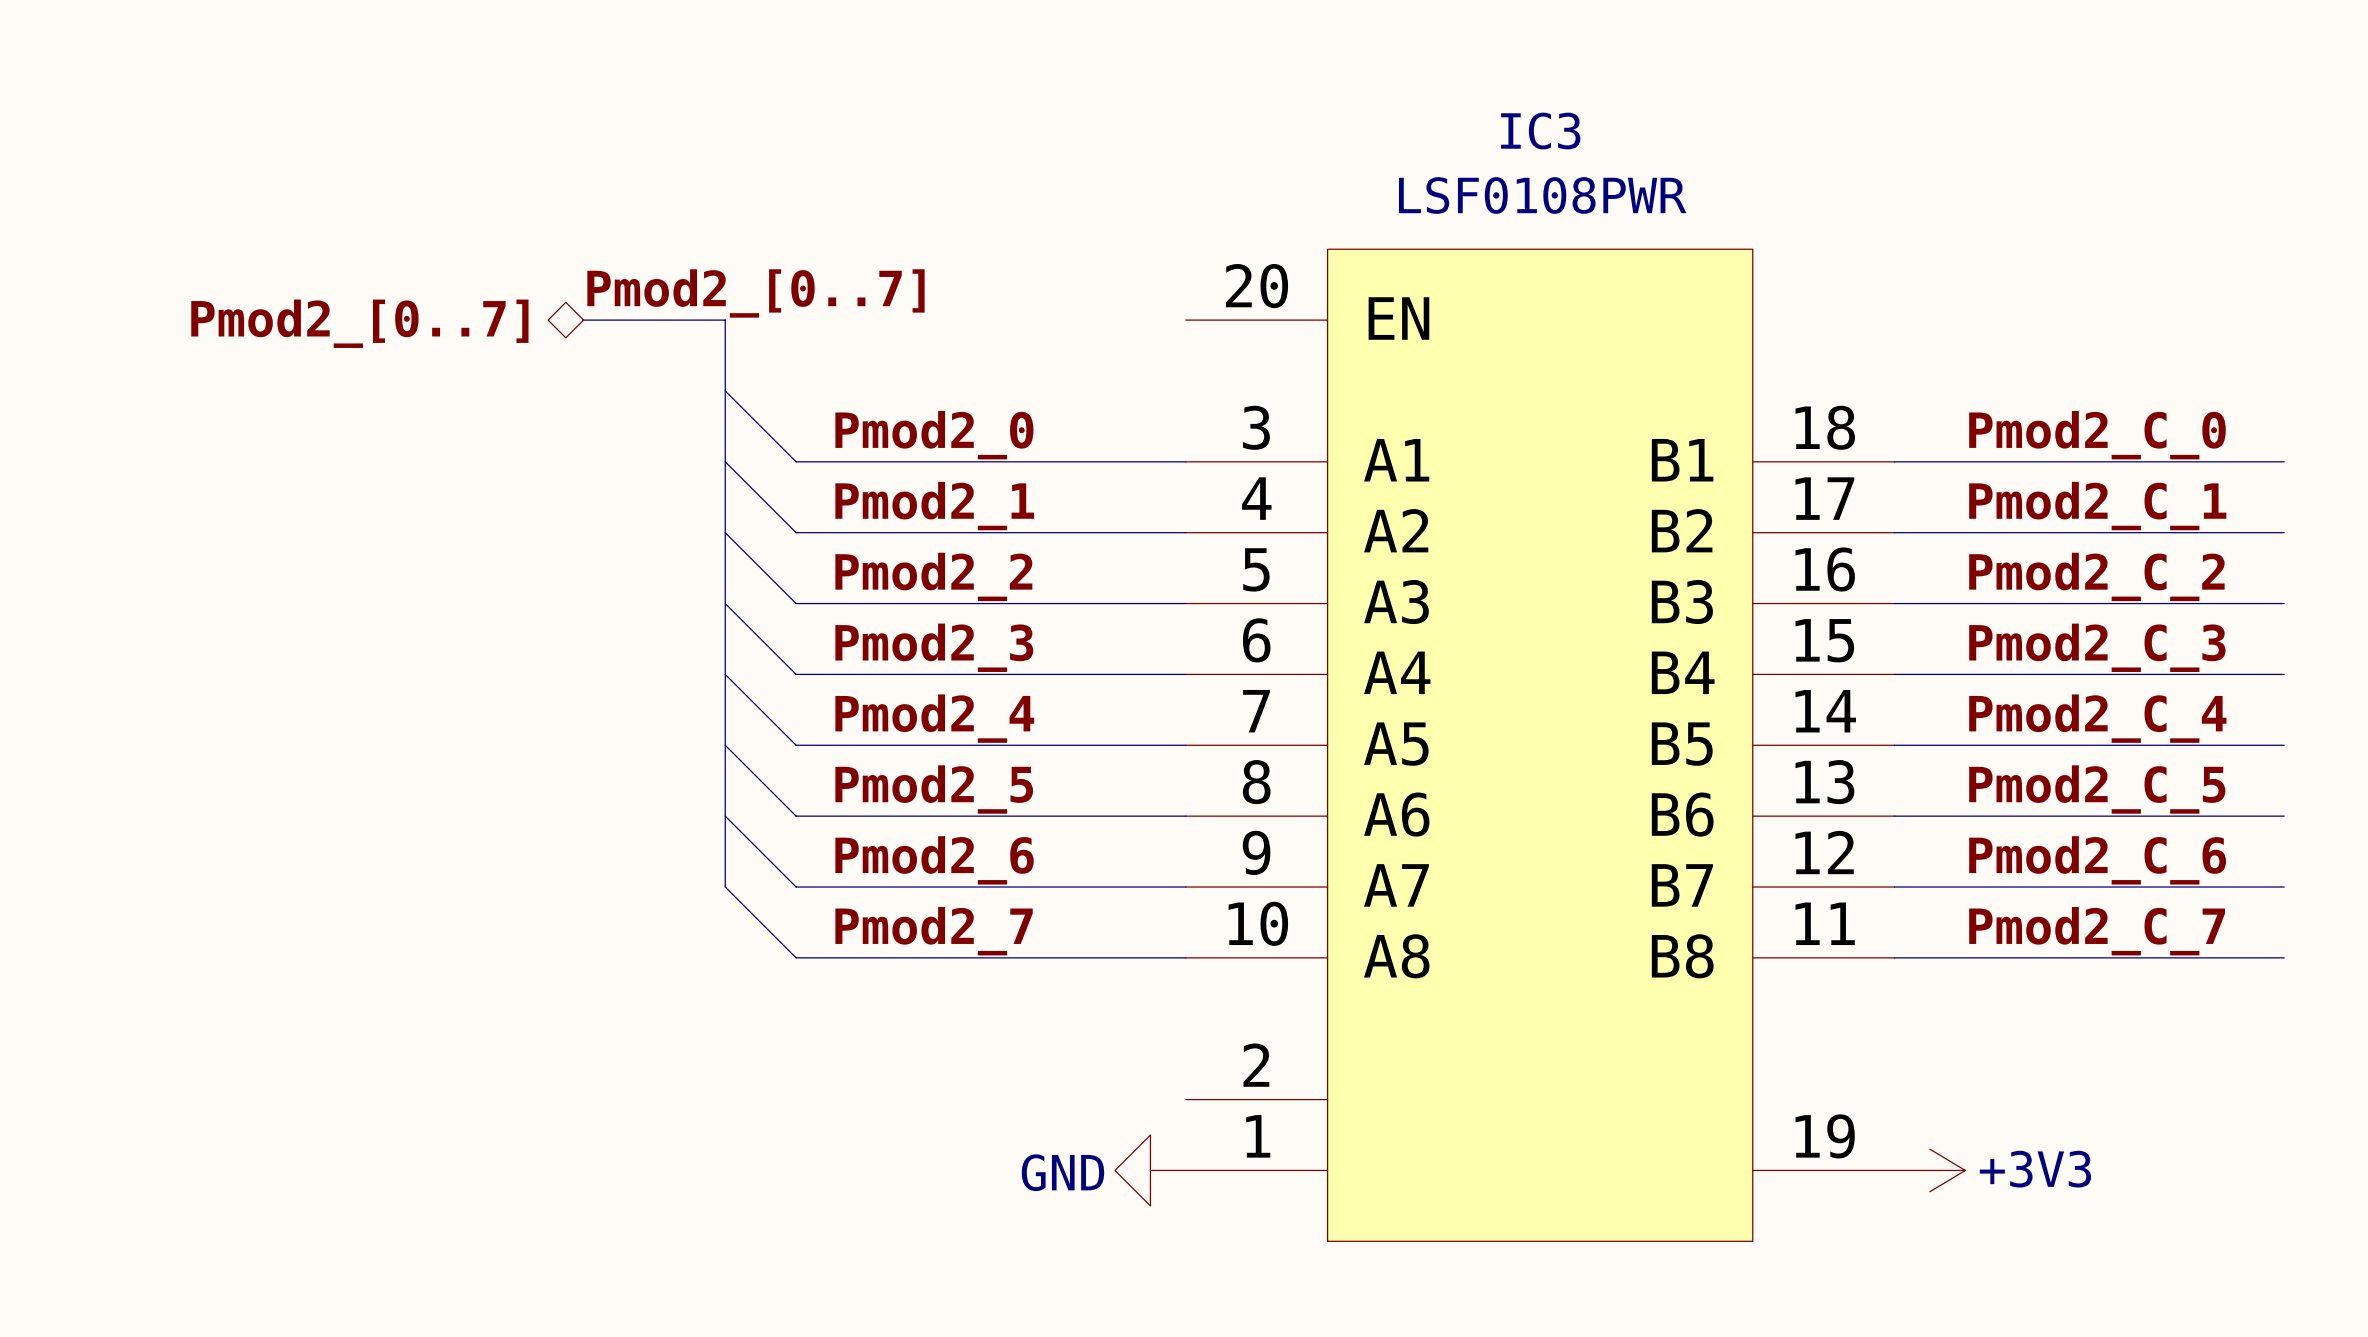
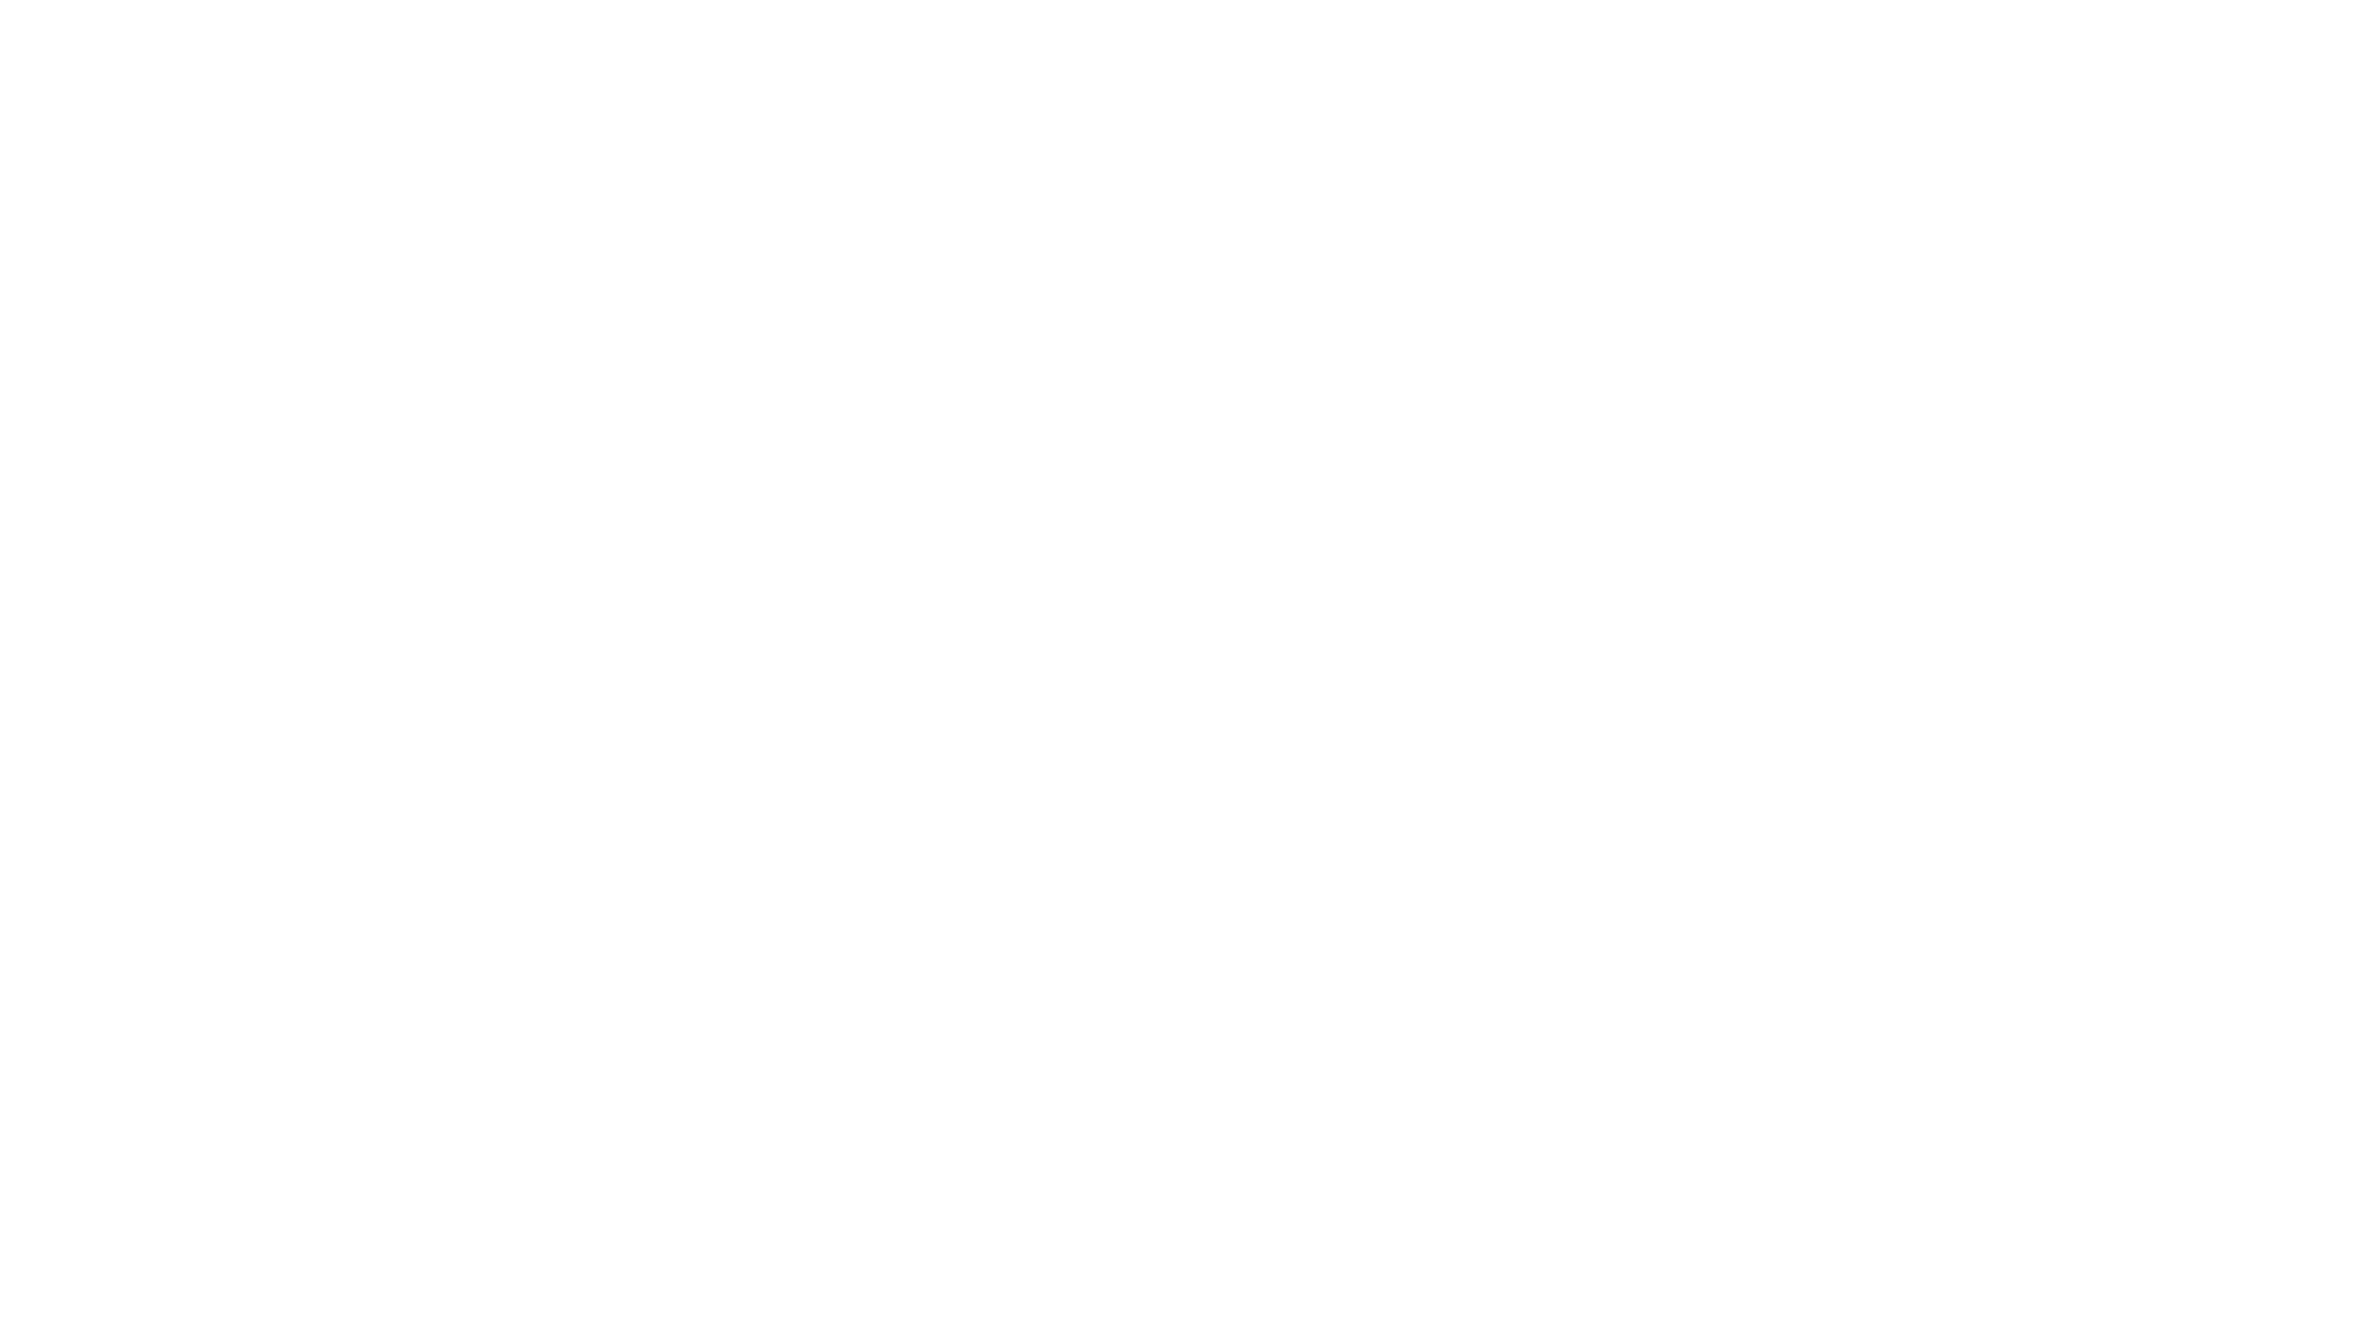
label: Pmod2_[0..7] (755, 293) -> none
bus: (583, 320) (725, 320) (725, 887) -> none
hierarchical label: Pmod2_[0..7] (359, 323) -> none
wire: (725, 390) (796, 461) (1185, 461) -> none
label: Pmod2_0 (934, 435) -> none
label: Pmod2_C_0 (2097, 435) -> none
wire: (725, 461) (796, 532) (1185, 532) -> none
wire: (1894, 461) (2284, 461) -> none
label: Pmod2_1 (934, 506) -> none
label: Pmod2_C_1 (2097, 506) -> none
wire: (725, 532) (796, 603) (1185, 603) -> none
wire: (1894, 532) (2284, 532) -> none
label: Pmod2_2 (933, 576) -> none
label: Pmod2_C_2 (2096, 576) -> none
wire: (725, 603) (796, 674) (1185, 674) -> none
wire: (1894, 603) (2284, 603) -> none
label: Pmod2_3 (934, 647) -> none
label: Pmod2_C_3 (2097, 647) -> none
wire: (725, 674) (796, 745) (1185, 745) -> none
wire: (1894, 674) (2284, 674) -> none
label: Pmod2_4 (934, 718) -> none
label: Pmod2_C_4 (2097, 718) -> none
wire: (725, 745) (796, 816) (1185, 816) -> none
IC3: LSF0108PWR (1540, 745) -> none
wire: (1894, 745) (2284, 745) -> none
label: Pmod2_5 (934, 789) -> none
label: Pmod2_C_5 (2097, 789) -> none
wire: (725, 816) (796, 887) (1185, 887) -> none
wire: (1894, 816) (2284, 816) -> none
label: Pmod2_6 (934, 860) -> none
label: Pmod2_C_6 (2097, 860) -> none
wire: (725, 887) (796, 957) (1185, 957) -> none
wire: (1894, 887) (2284, 887) -> none
label: Pmod2_7 (934, 931) -> none
label: Pmod2_C_7 (2097, 931) -> none
wire: (1894, 957) (2284, 957) -> none
power symbol: GND (1150, 1170) -> none
power symbol: +3V3 (1929, 1170) -> none

